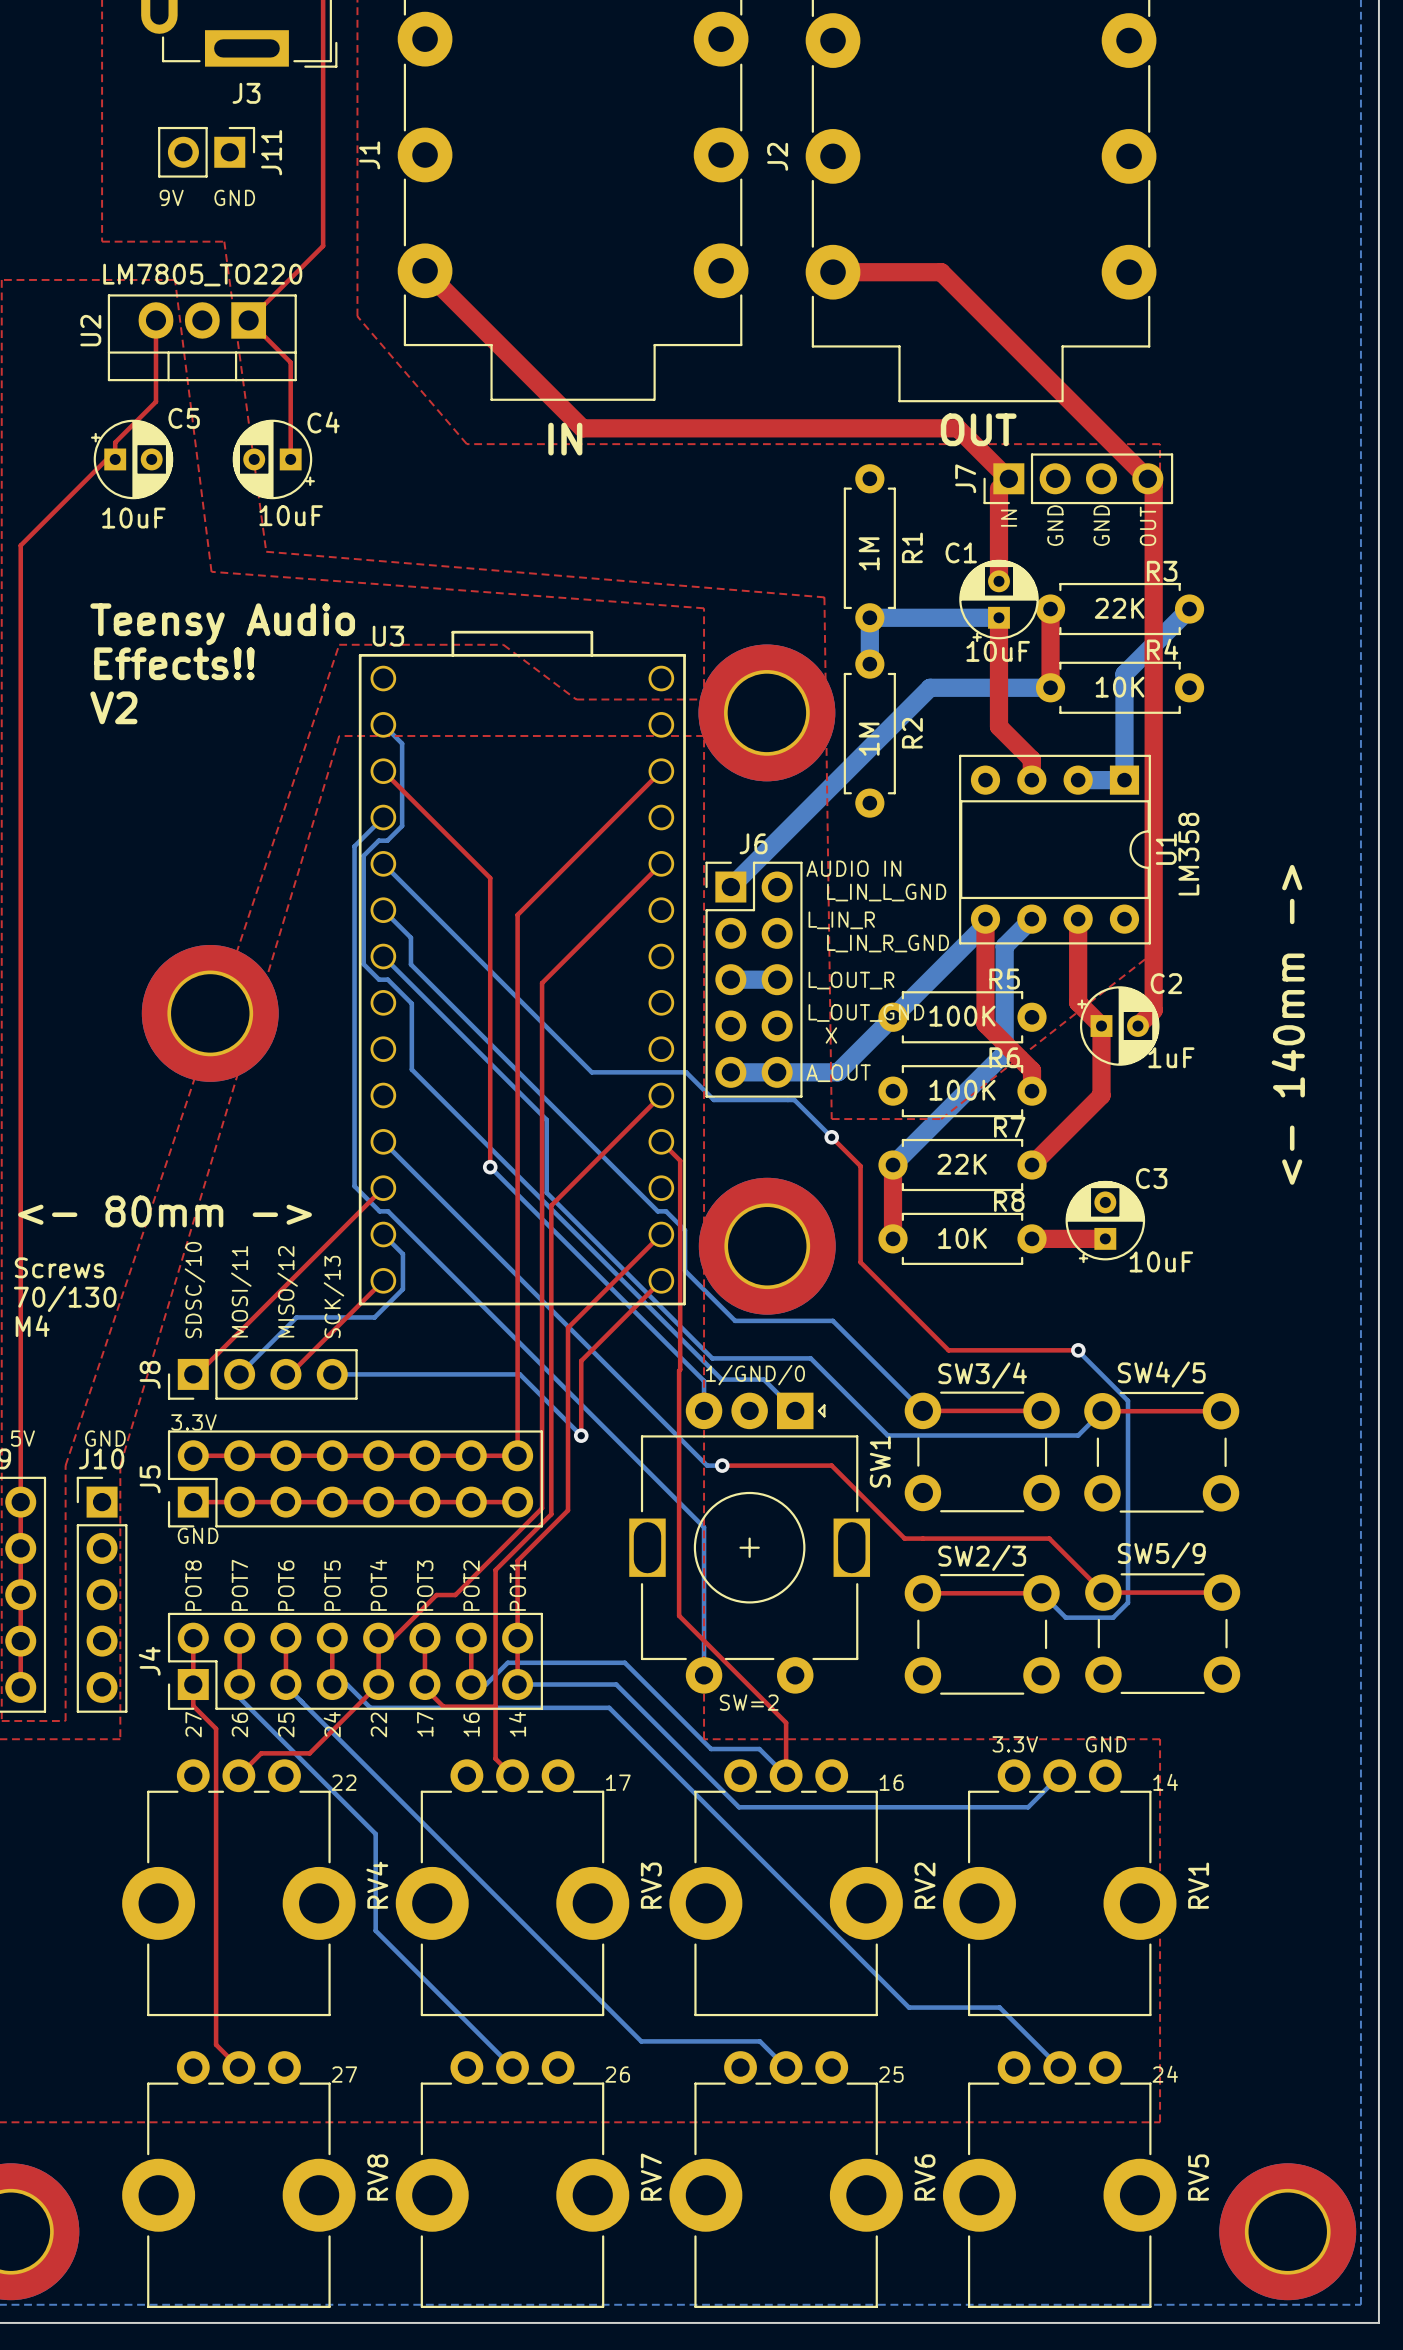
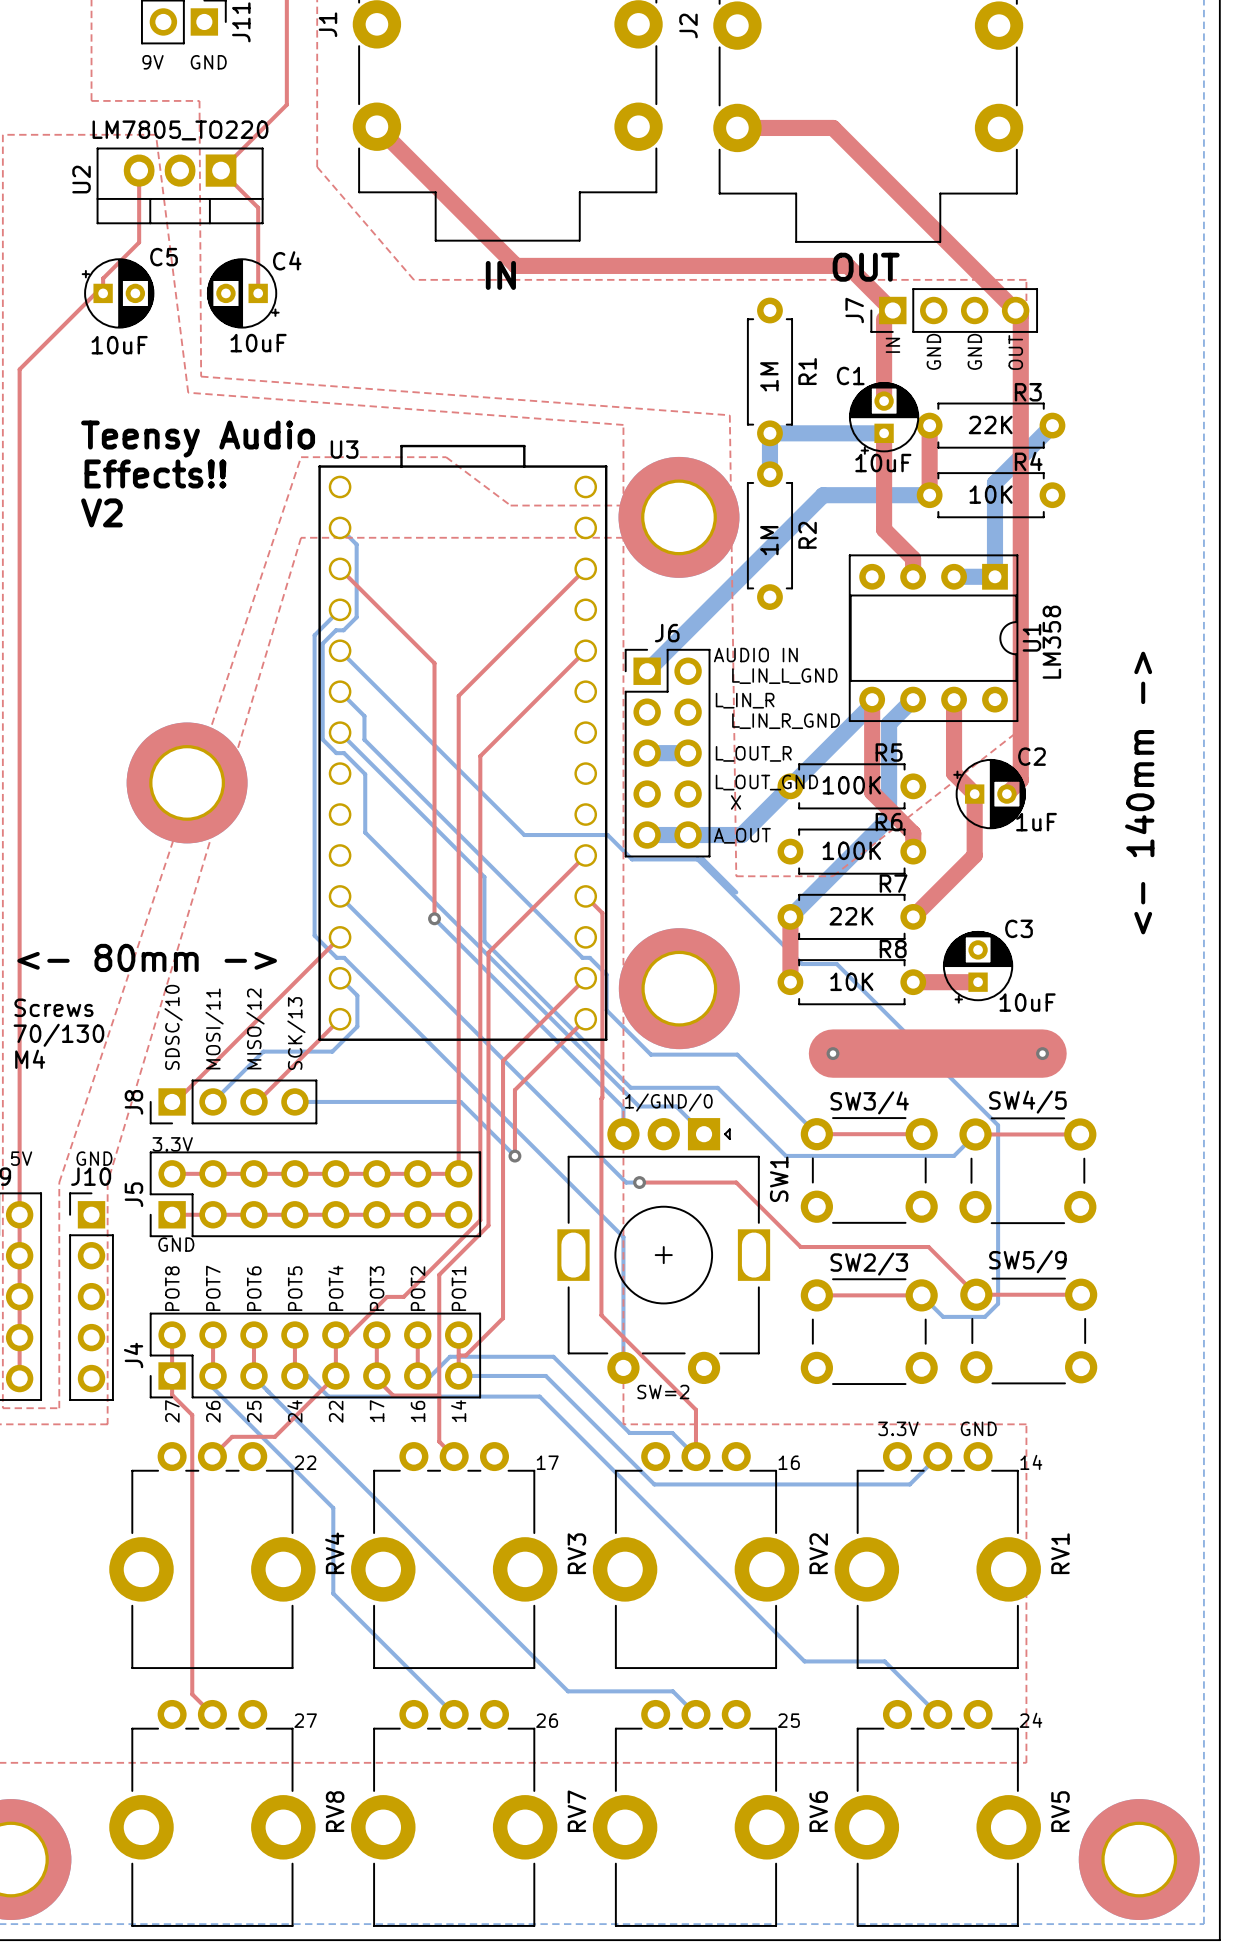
top zone outline: (224, 241) (266, 551) (824, 597) -> (199, 100) (201, 376) (729, 415)
top track: (831, 1137) (860, 1166) (860, 1262) (948, 1350) (1078, 1350) -> none
via: (831, 1137) -> none
top track: none -> (832, 1053) (1042, 1053)
via: none -> (832, 1053)
via: none -> (1042, 1053)
top track: (568, 1327) (568, 1510) (517, 1560) (517, 1638) -> (503, 1061) (503, 1318) (465, 1355) (458, 1355)
bottom track: (1078, 1350) (1128, 1400) -> (697, 859) (802, 964) (836, 964) (998, 1125)
via: (1078, 1350) -> none

